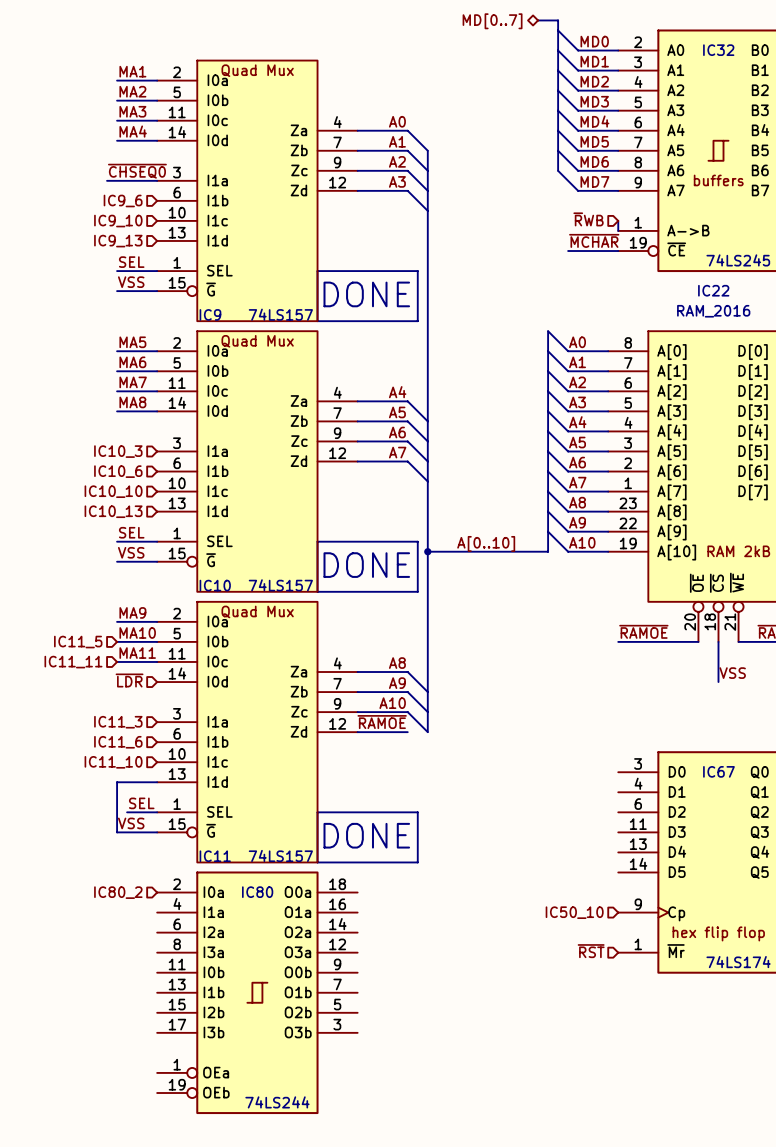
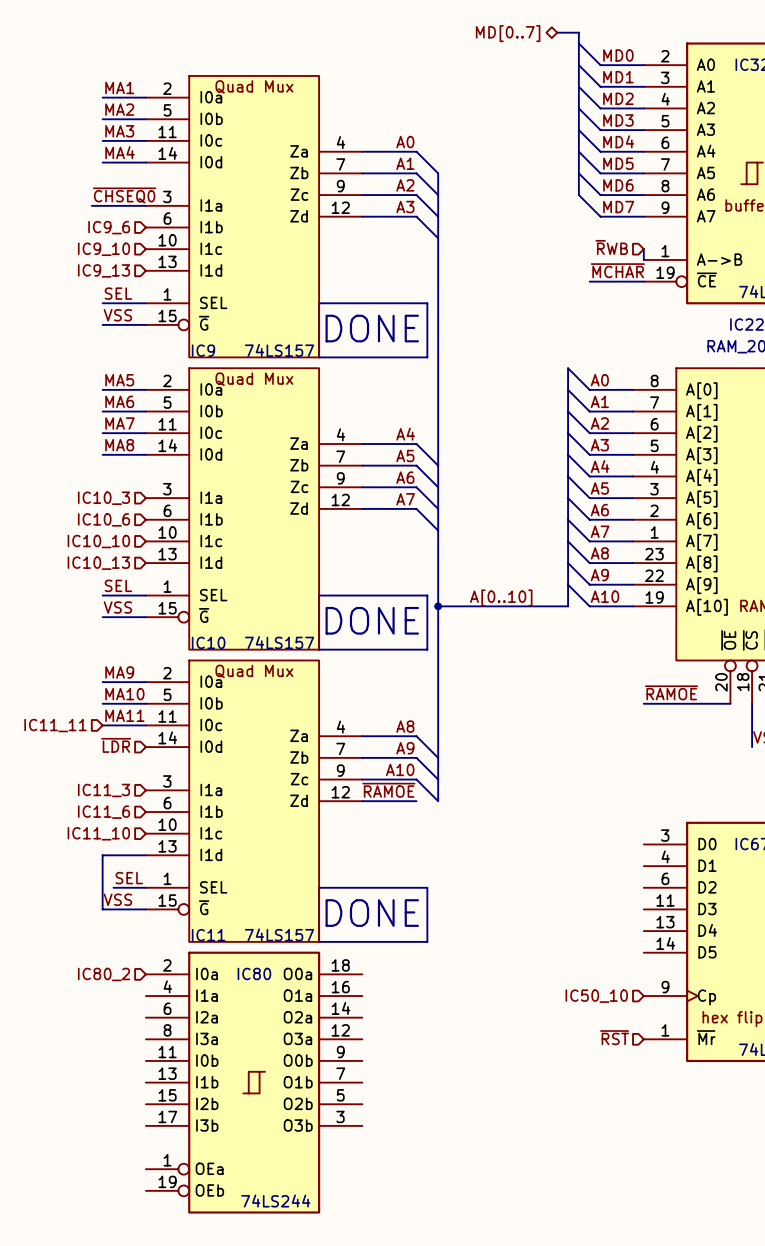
hierarchical label: IC11_5 (78, 642) -> none

